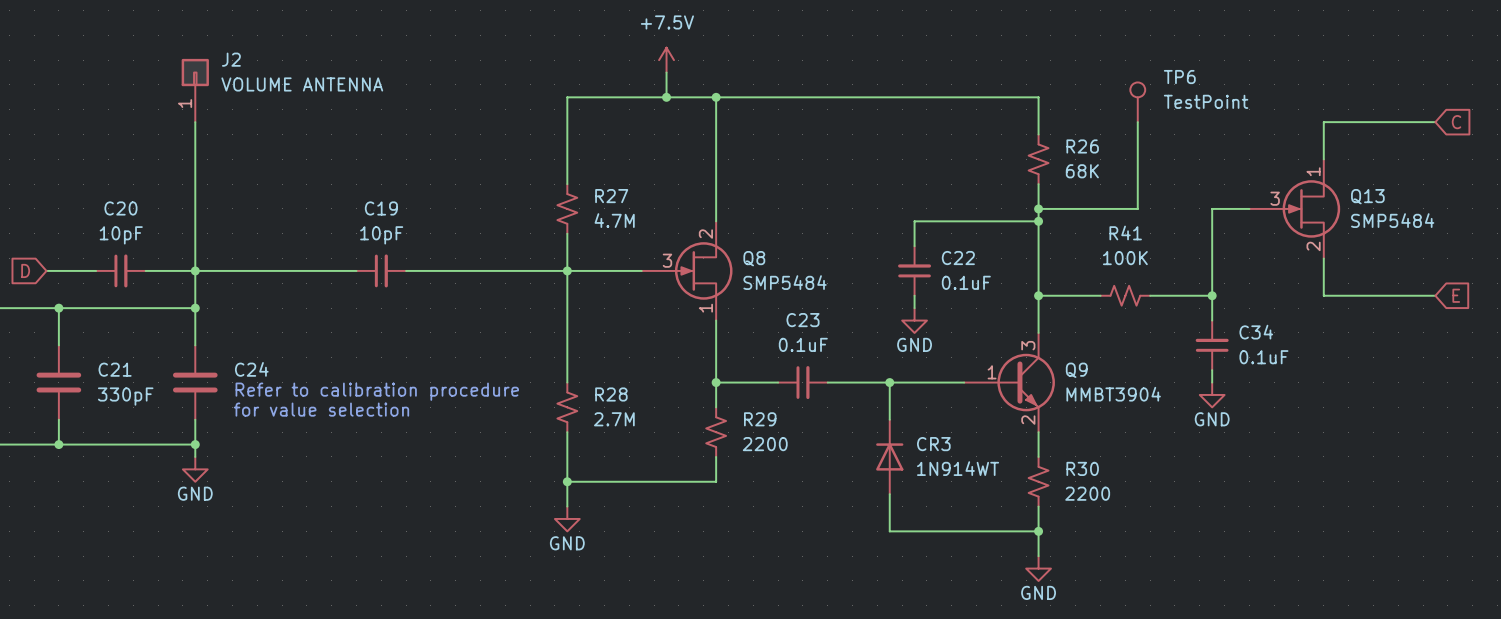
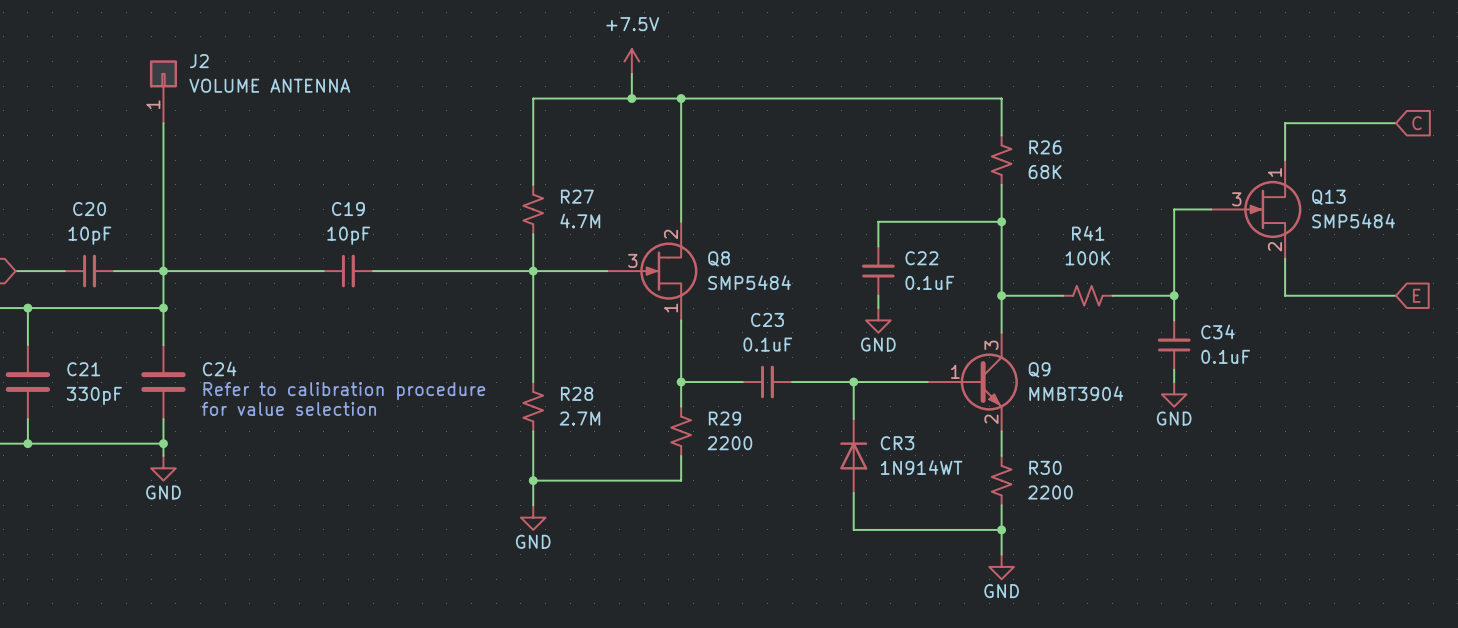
TP6: TestPoint (1137, 102) -> none
wire: (1137, 122) (1137, 208) (1038, 208) -> none
junction: (1038, 208) -> none

